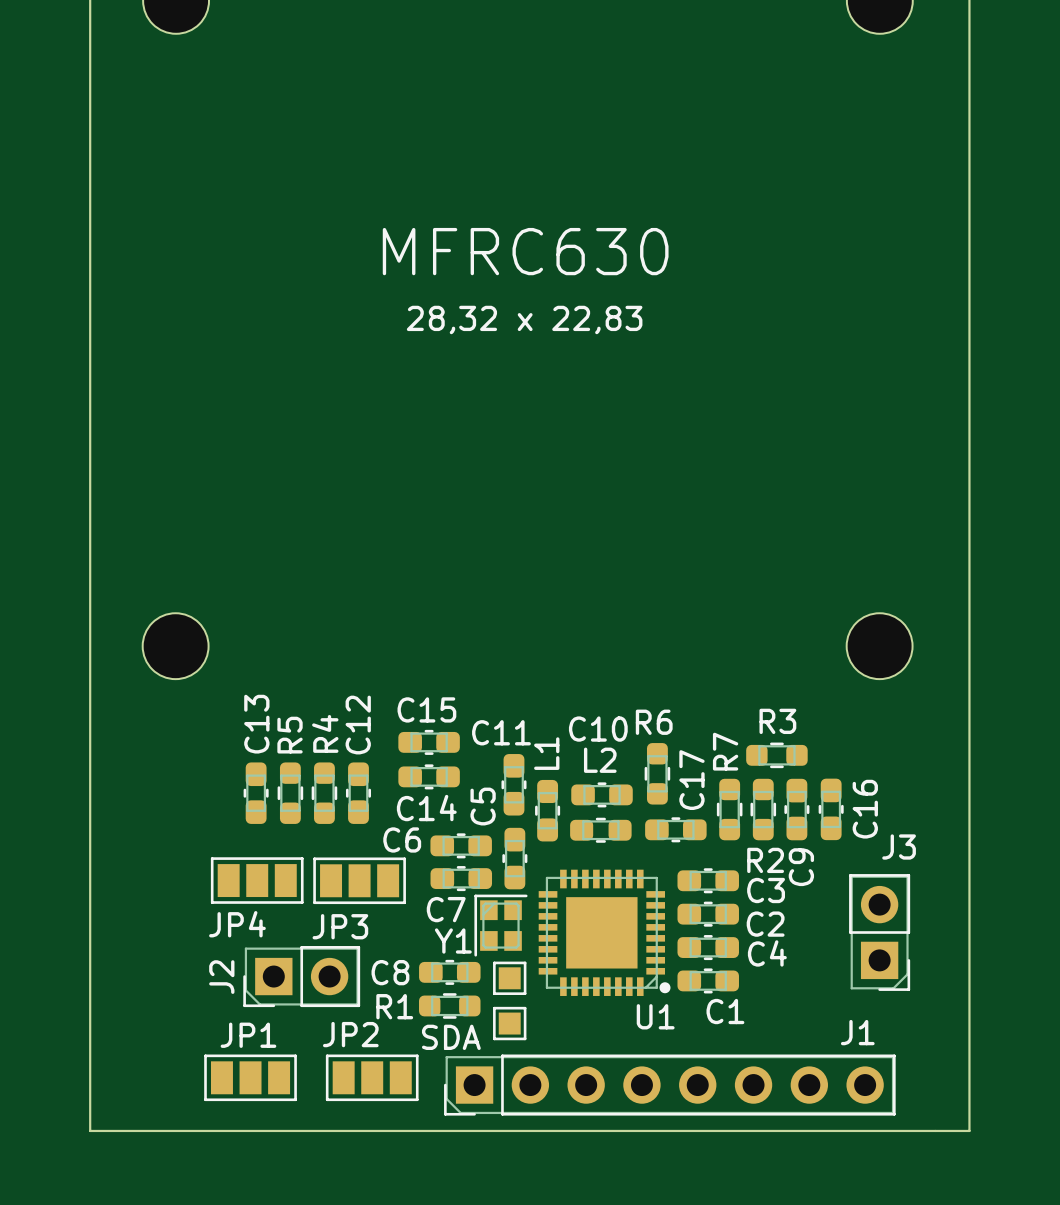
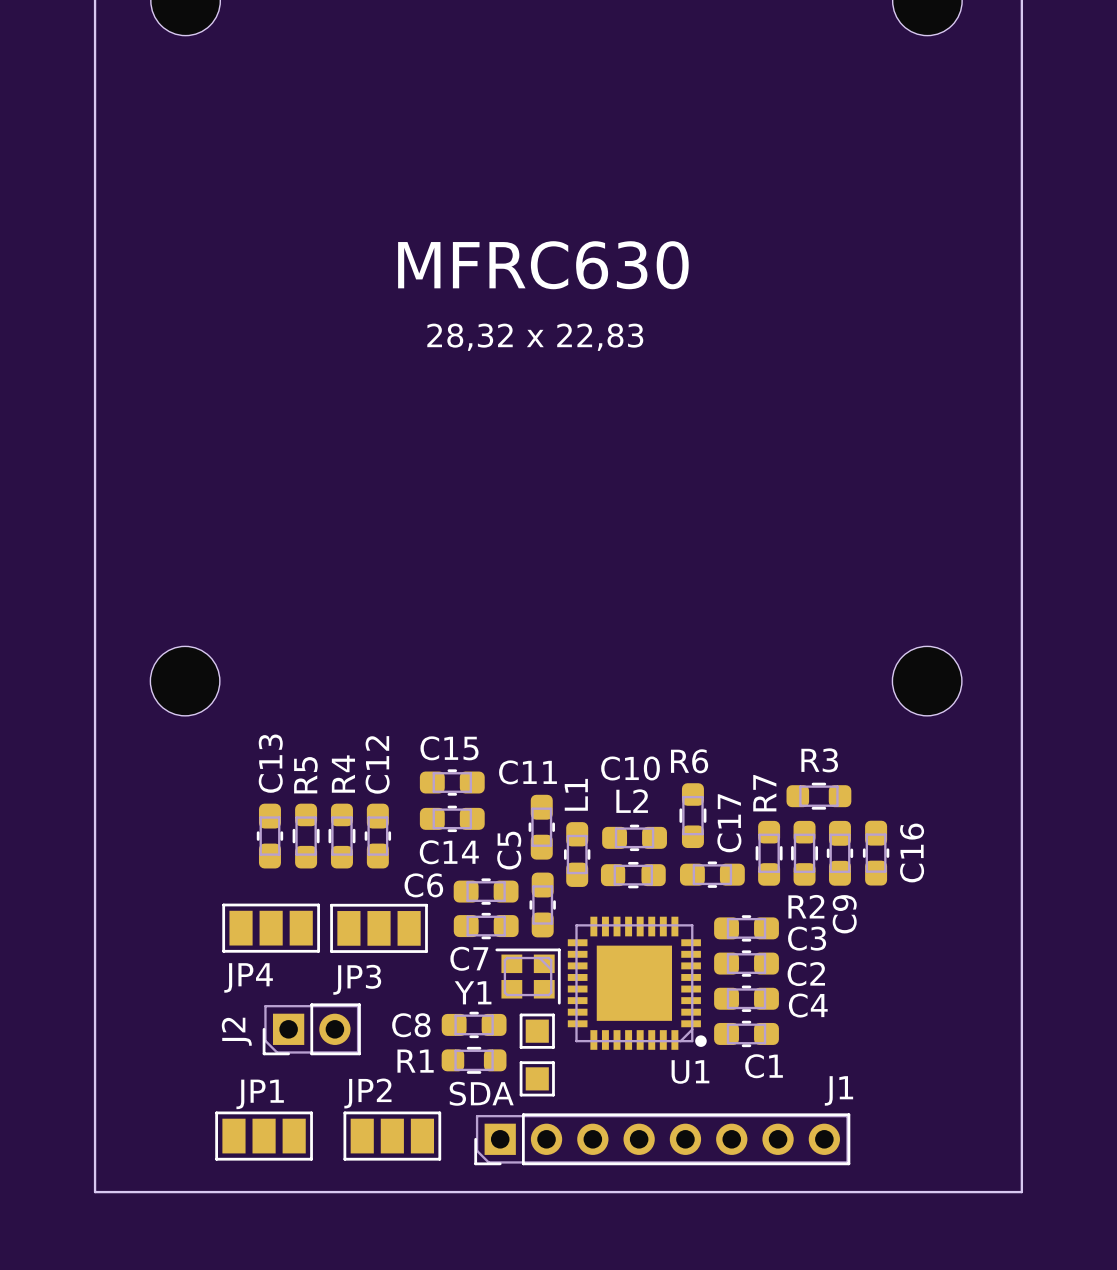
Y1 rotation: 0° (500, 925) -> 90° clockwise (528, 976)
J3: (879, 932) -> none
J2 footprint: [243, 946, 361, 1008] -> [262, 1003, 361, 1056]
text: SDA (451, 1037) -> none
SDA name: none -> SDA (481, 1093)
J1 footprint: [444, 1054, 896, 1116] -> [474, 1113, 851, 1166]

